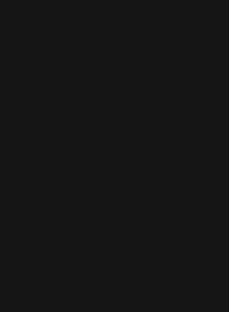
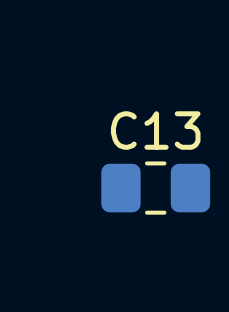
C13: none -> (155, 188)

